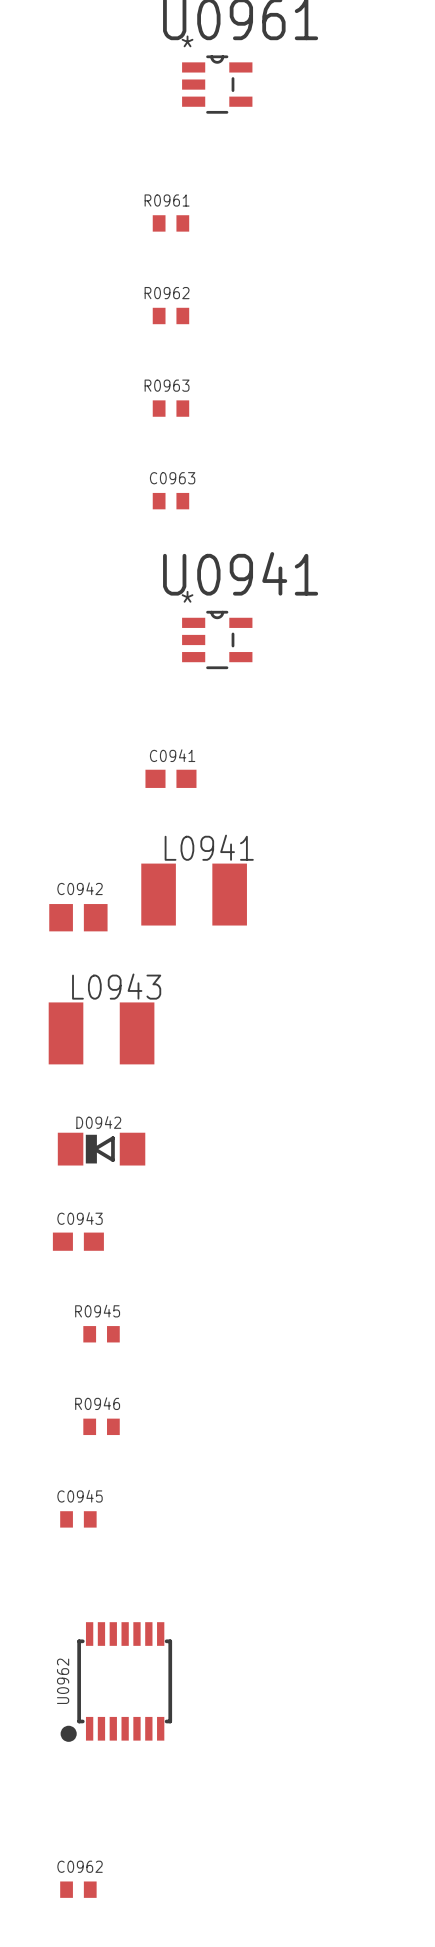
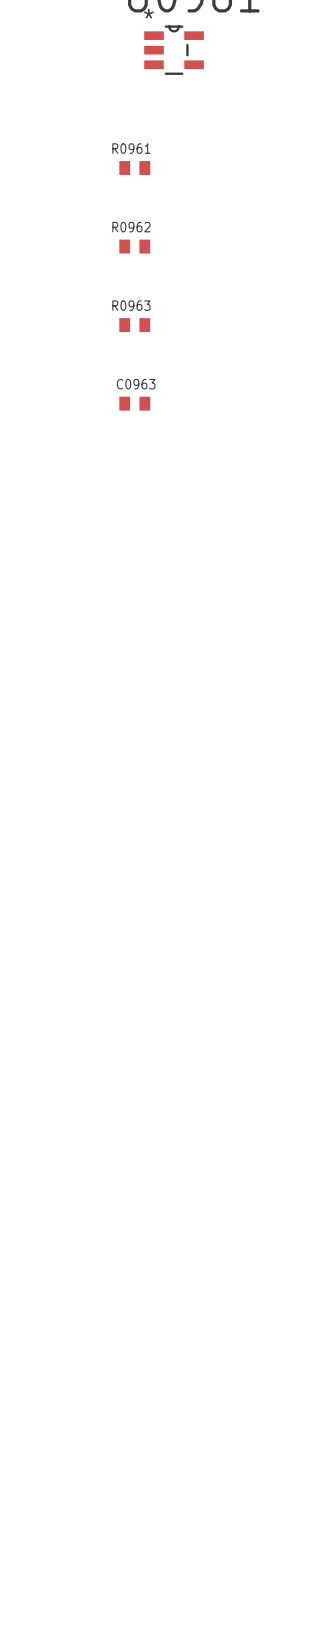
U0941: (217, 639) -> none
C0941: (170, 778) -> none
L0941: (194, 894) -> none
C0942: (78, 917) -> none
L0943: (101, 1033) -> none
D0942: (101, 1149) -> none
C0943: (78, 1241) -> none
R0945: (101, 1334) -> none
R0946: (101, 1426) -> none
C0945: (78, 1519) -> none
U0962: (116, 1682) -> none
C0962: (78, 1889) -> none

